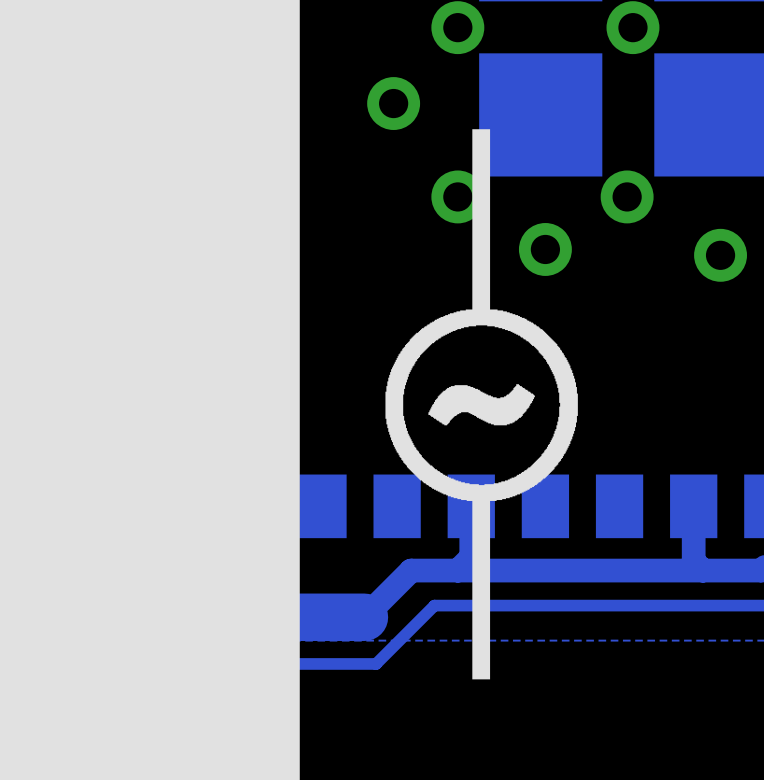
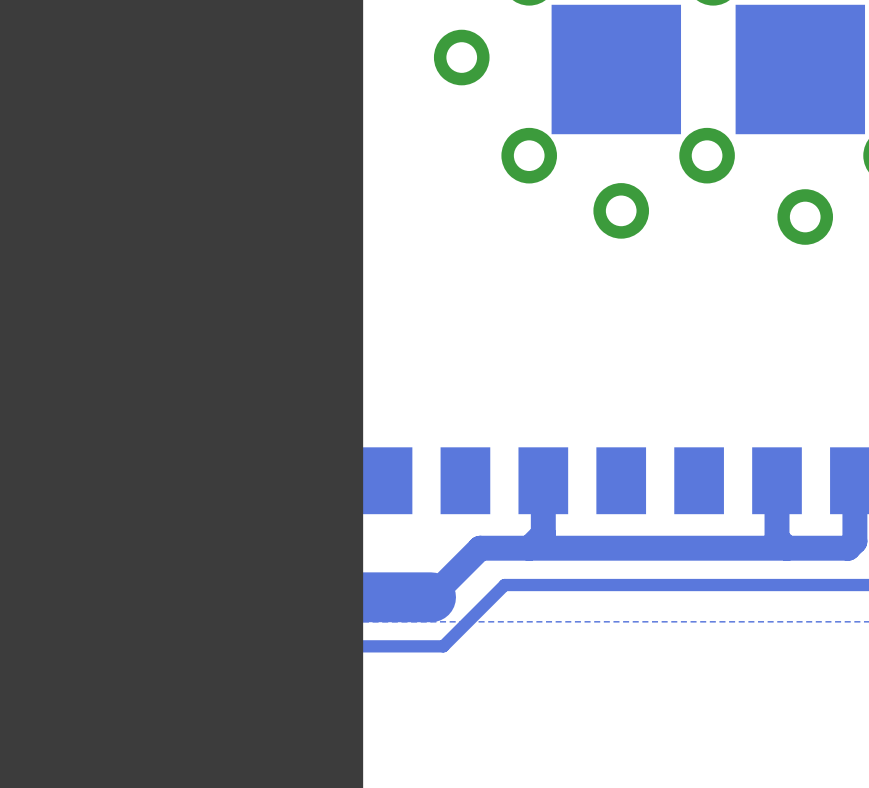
drawing: [385, 129, 578, 680] -> none

